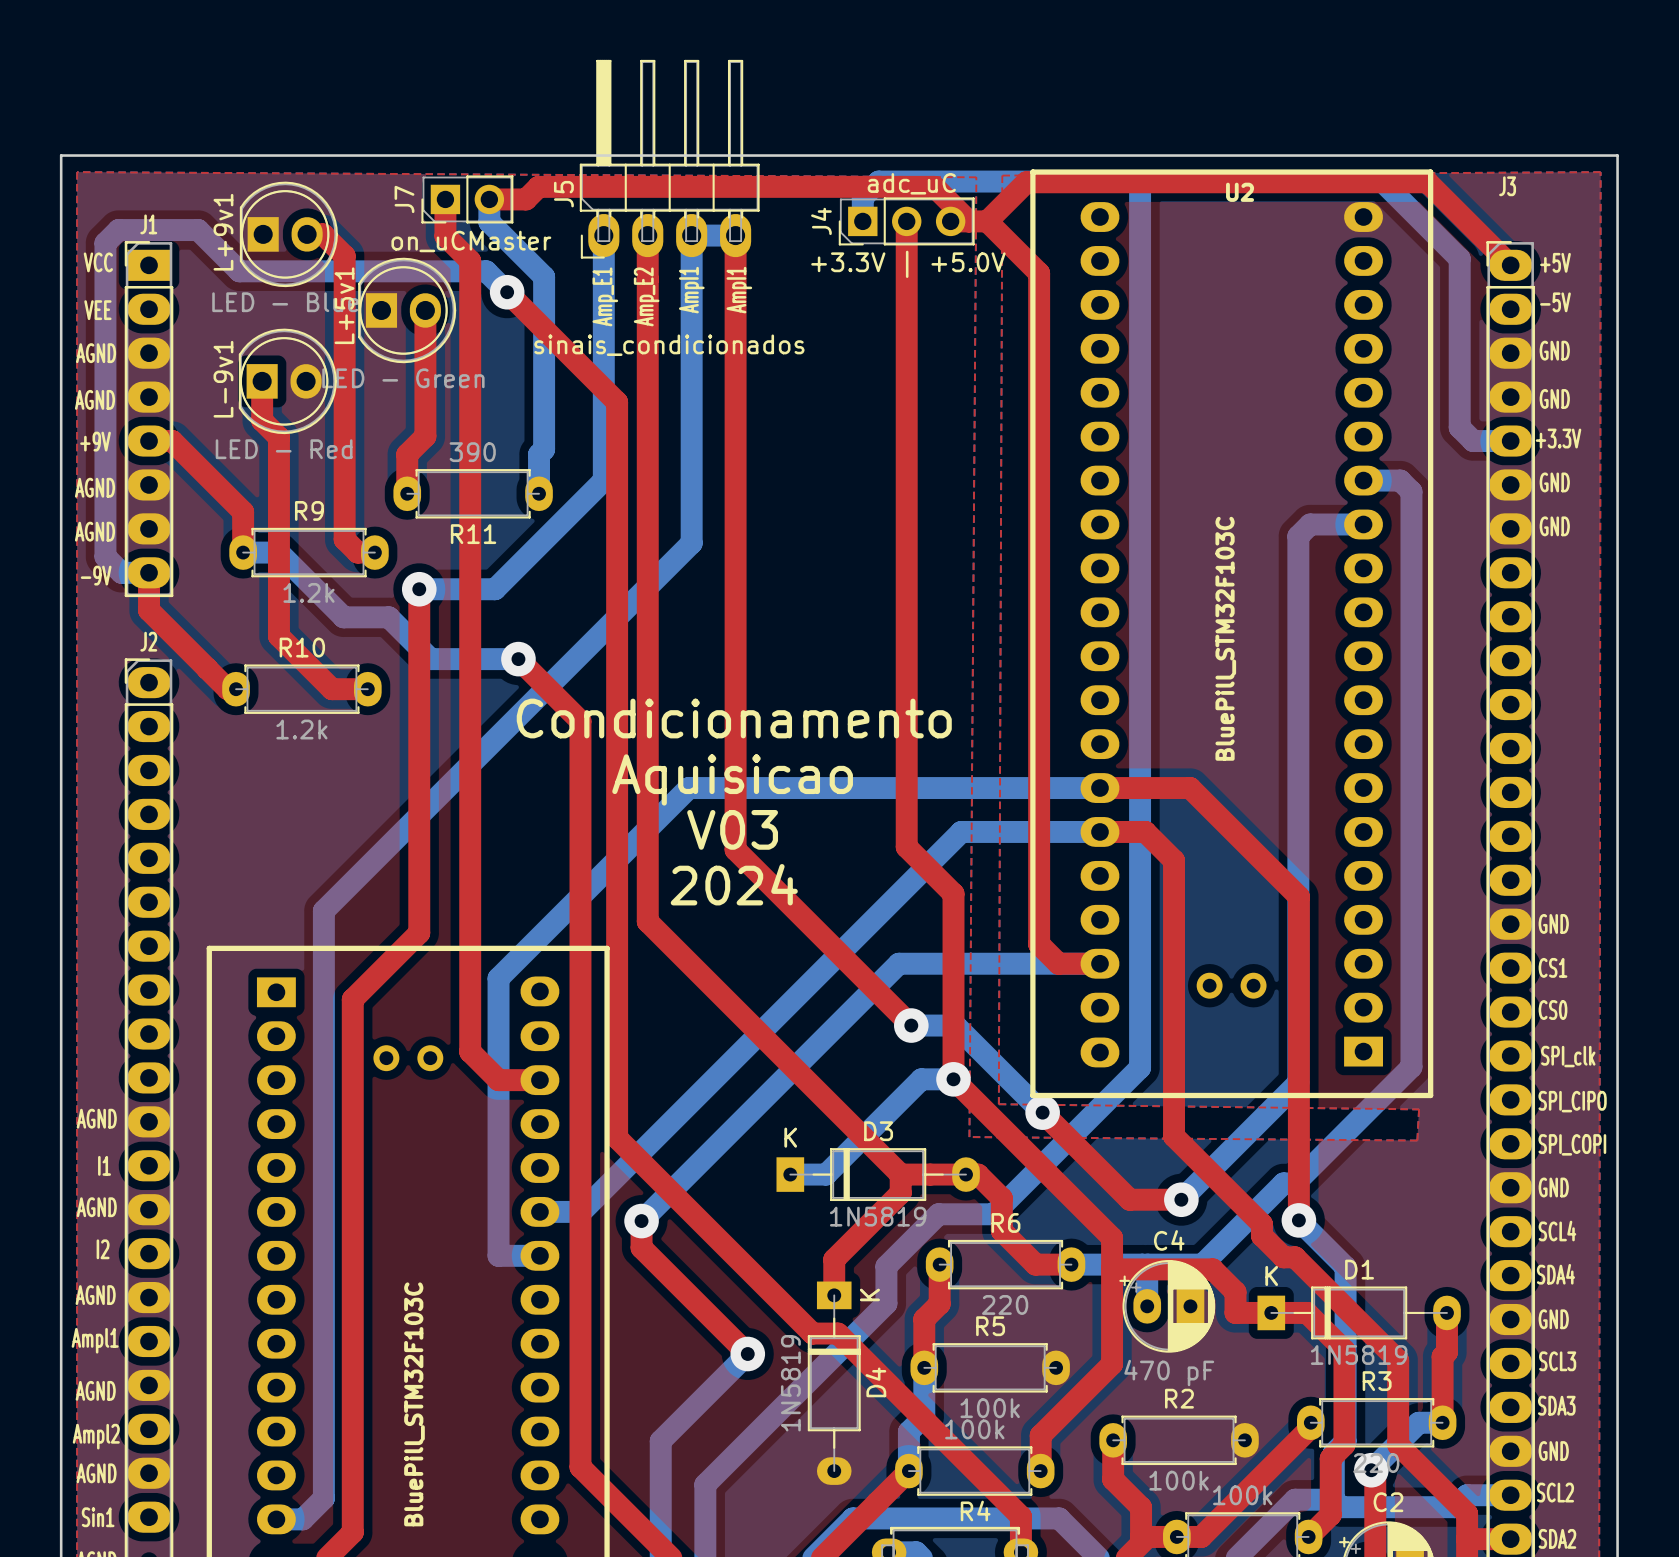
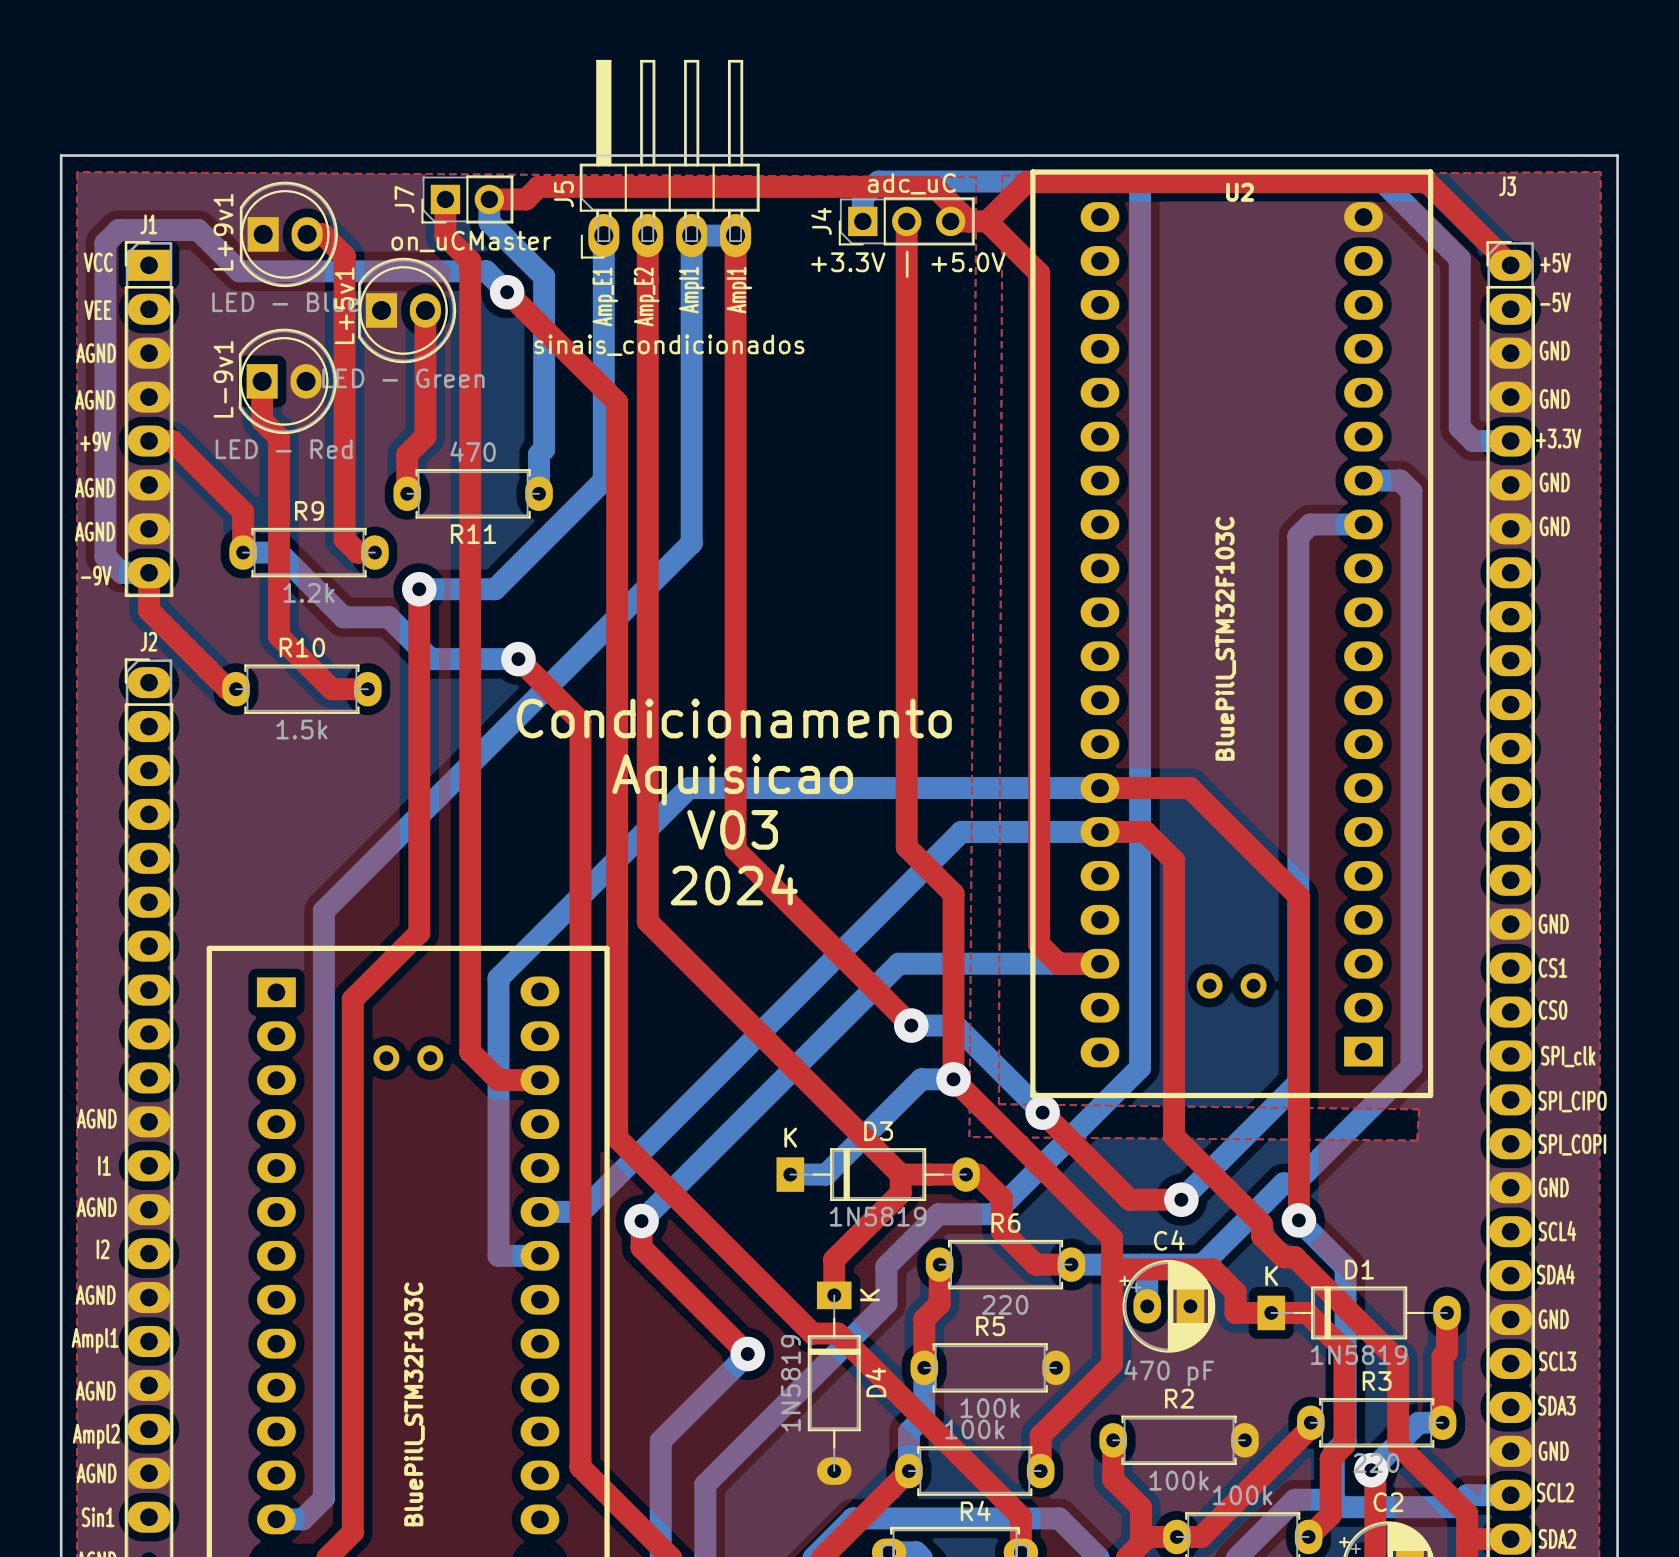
R11 value: 390 (472, 452) -> 470 (473, 451)
R10 value: 1.2k (301, 729) -> 1.5k (301, 729)

